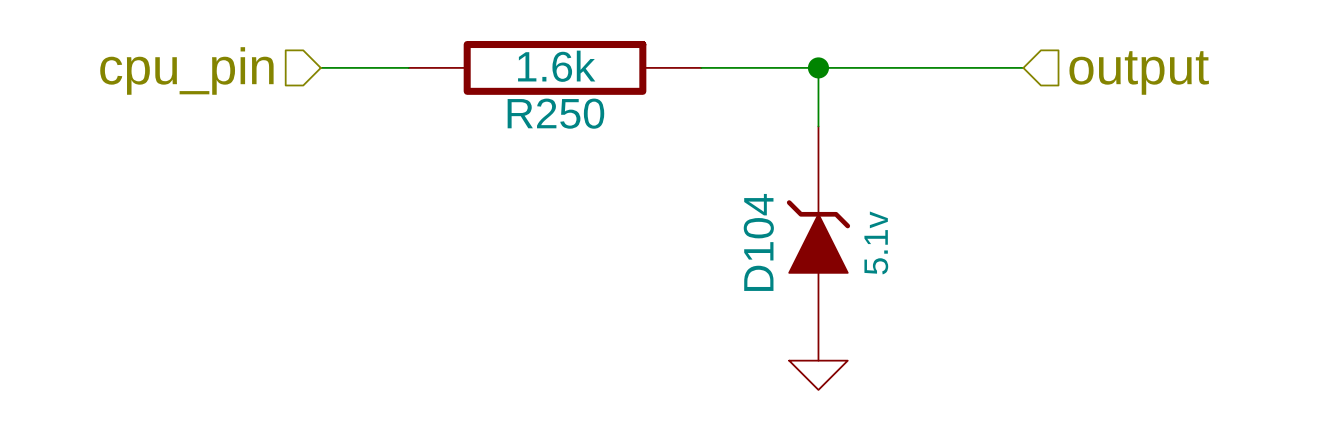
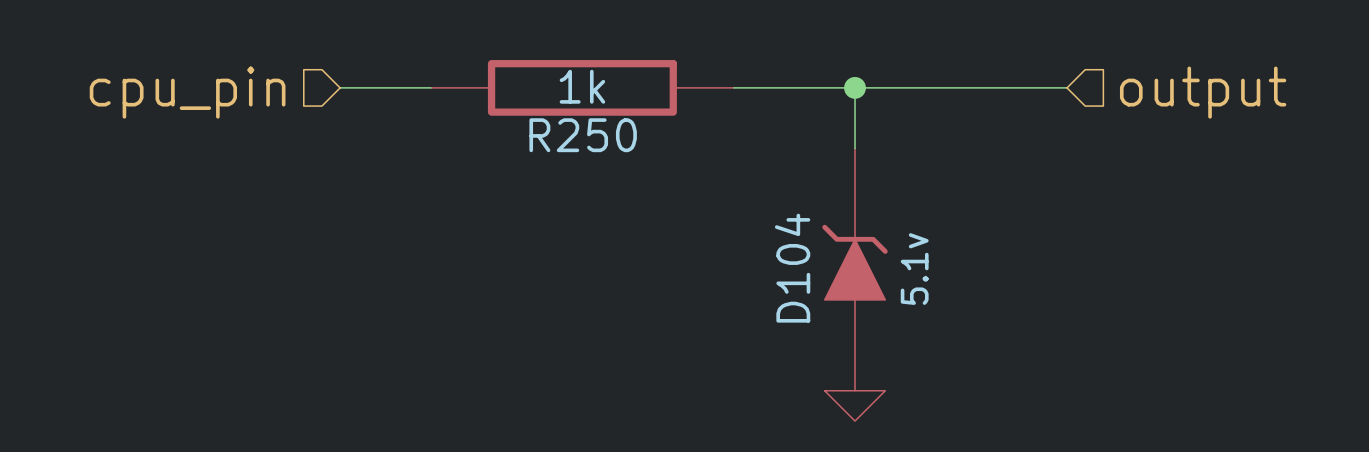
R250 value: 1.6k (556, 66) -> 1k (582, 86)

